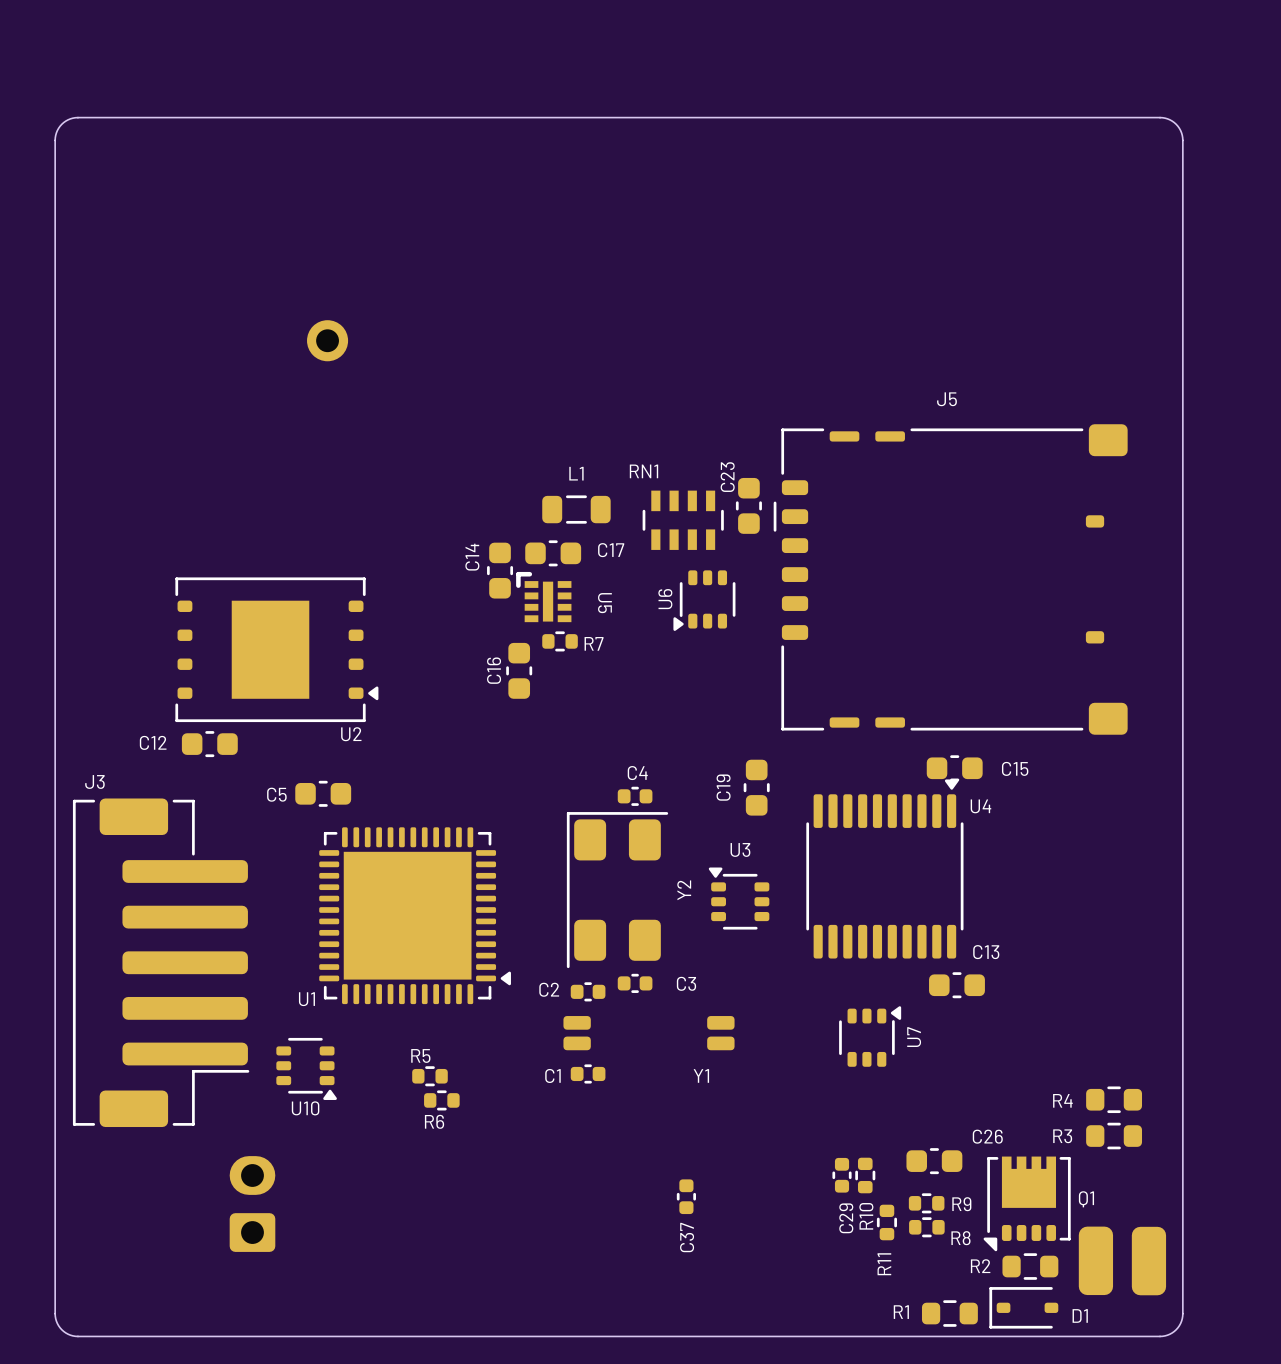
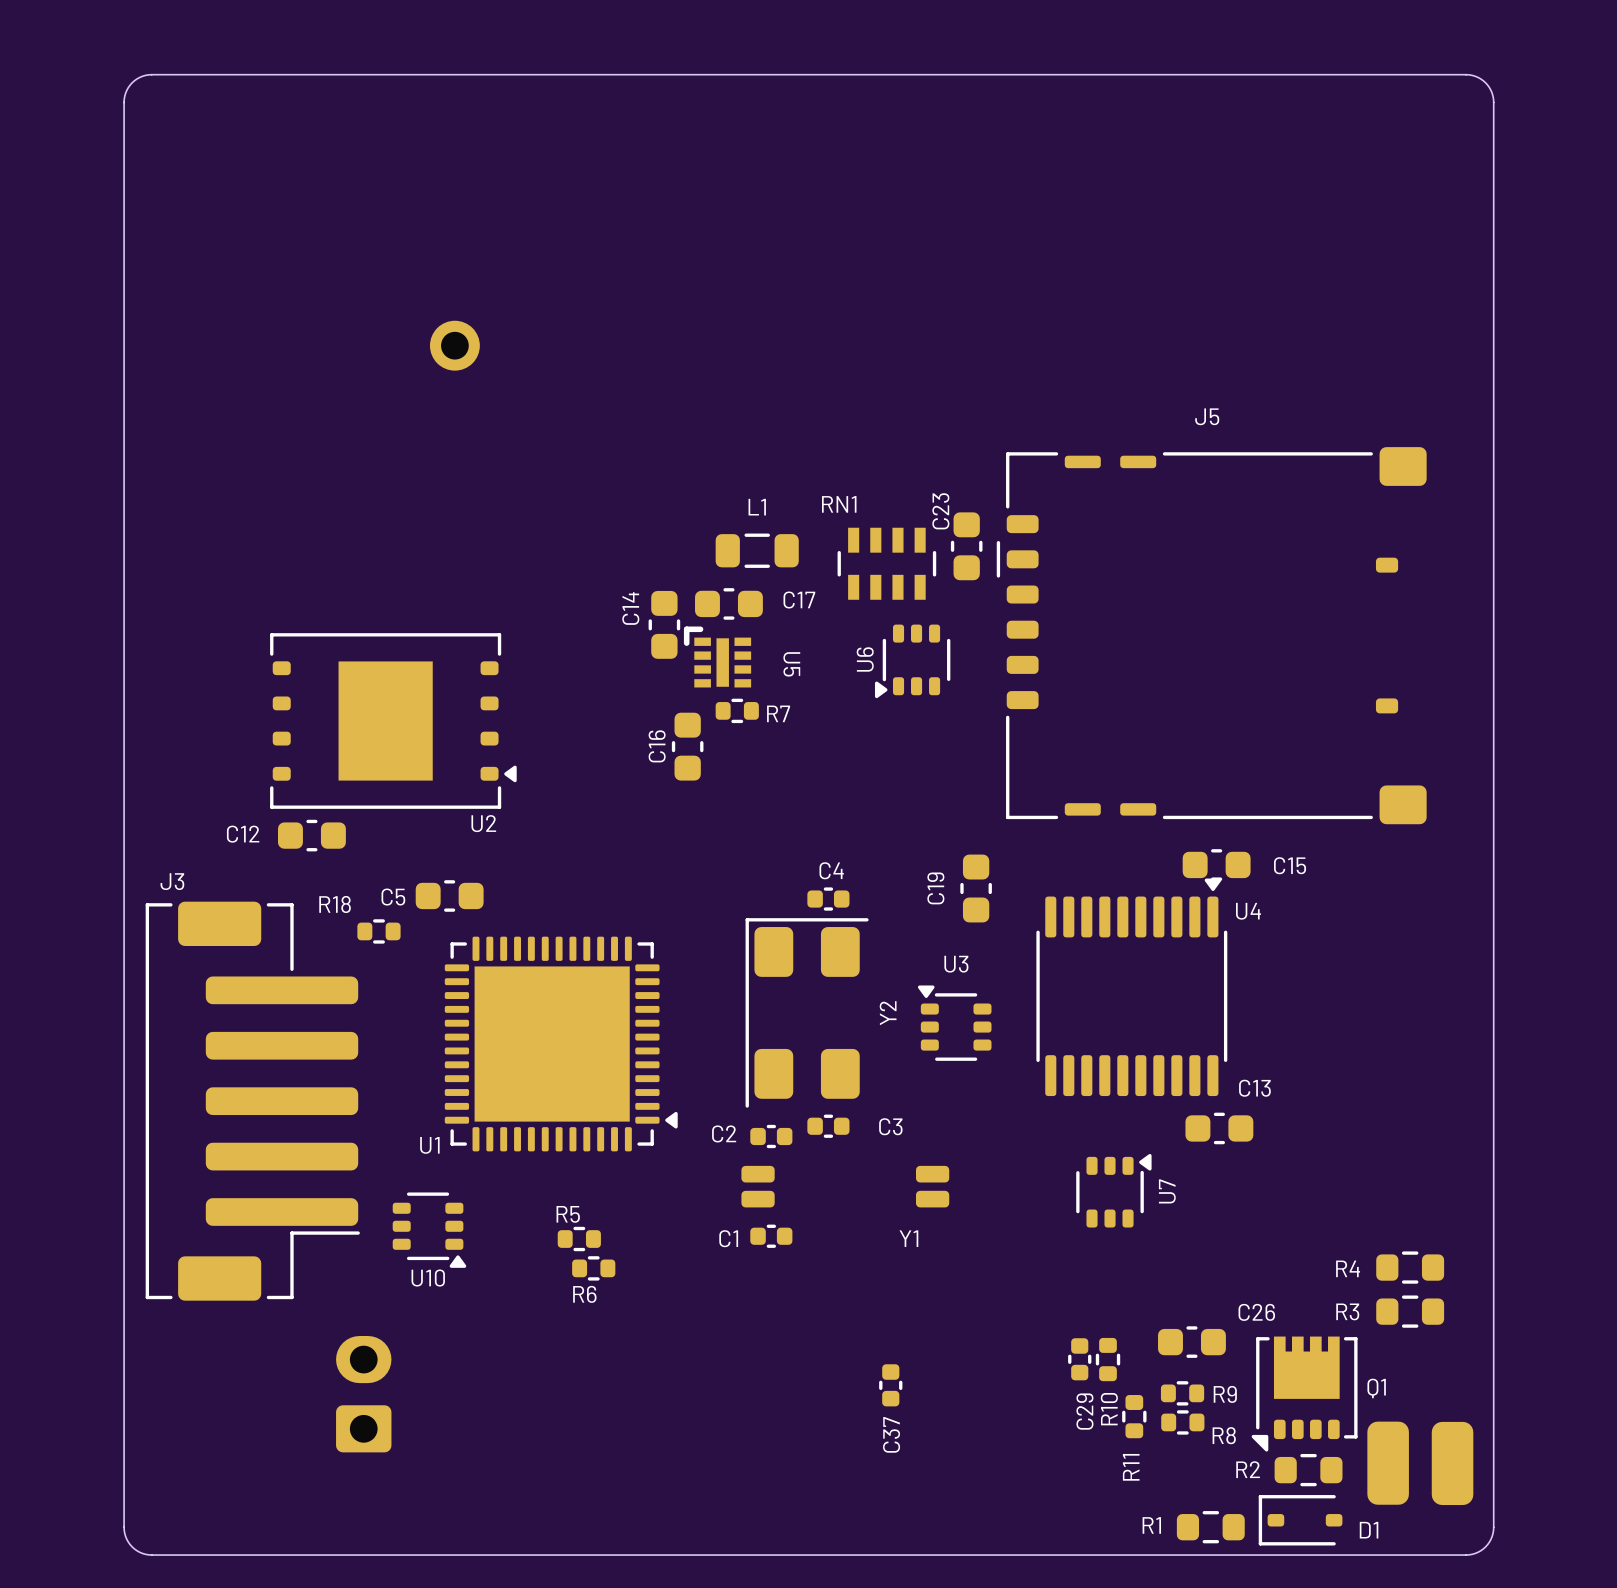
R18: none -> (378, 931)

